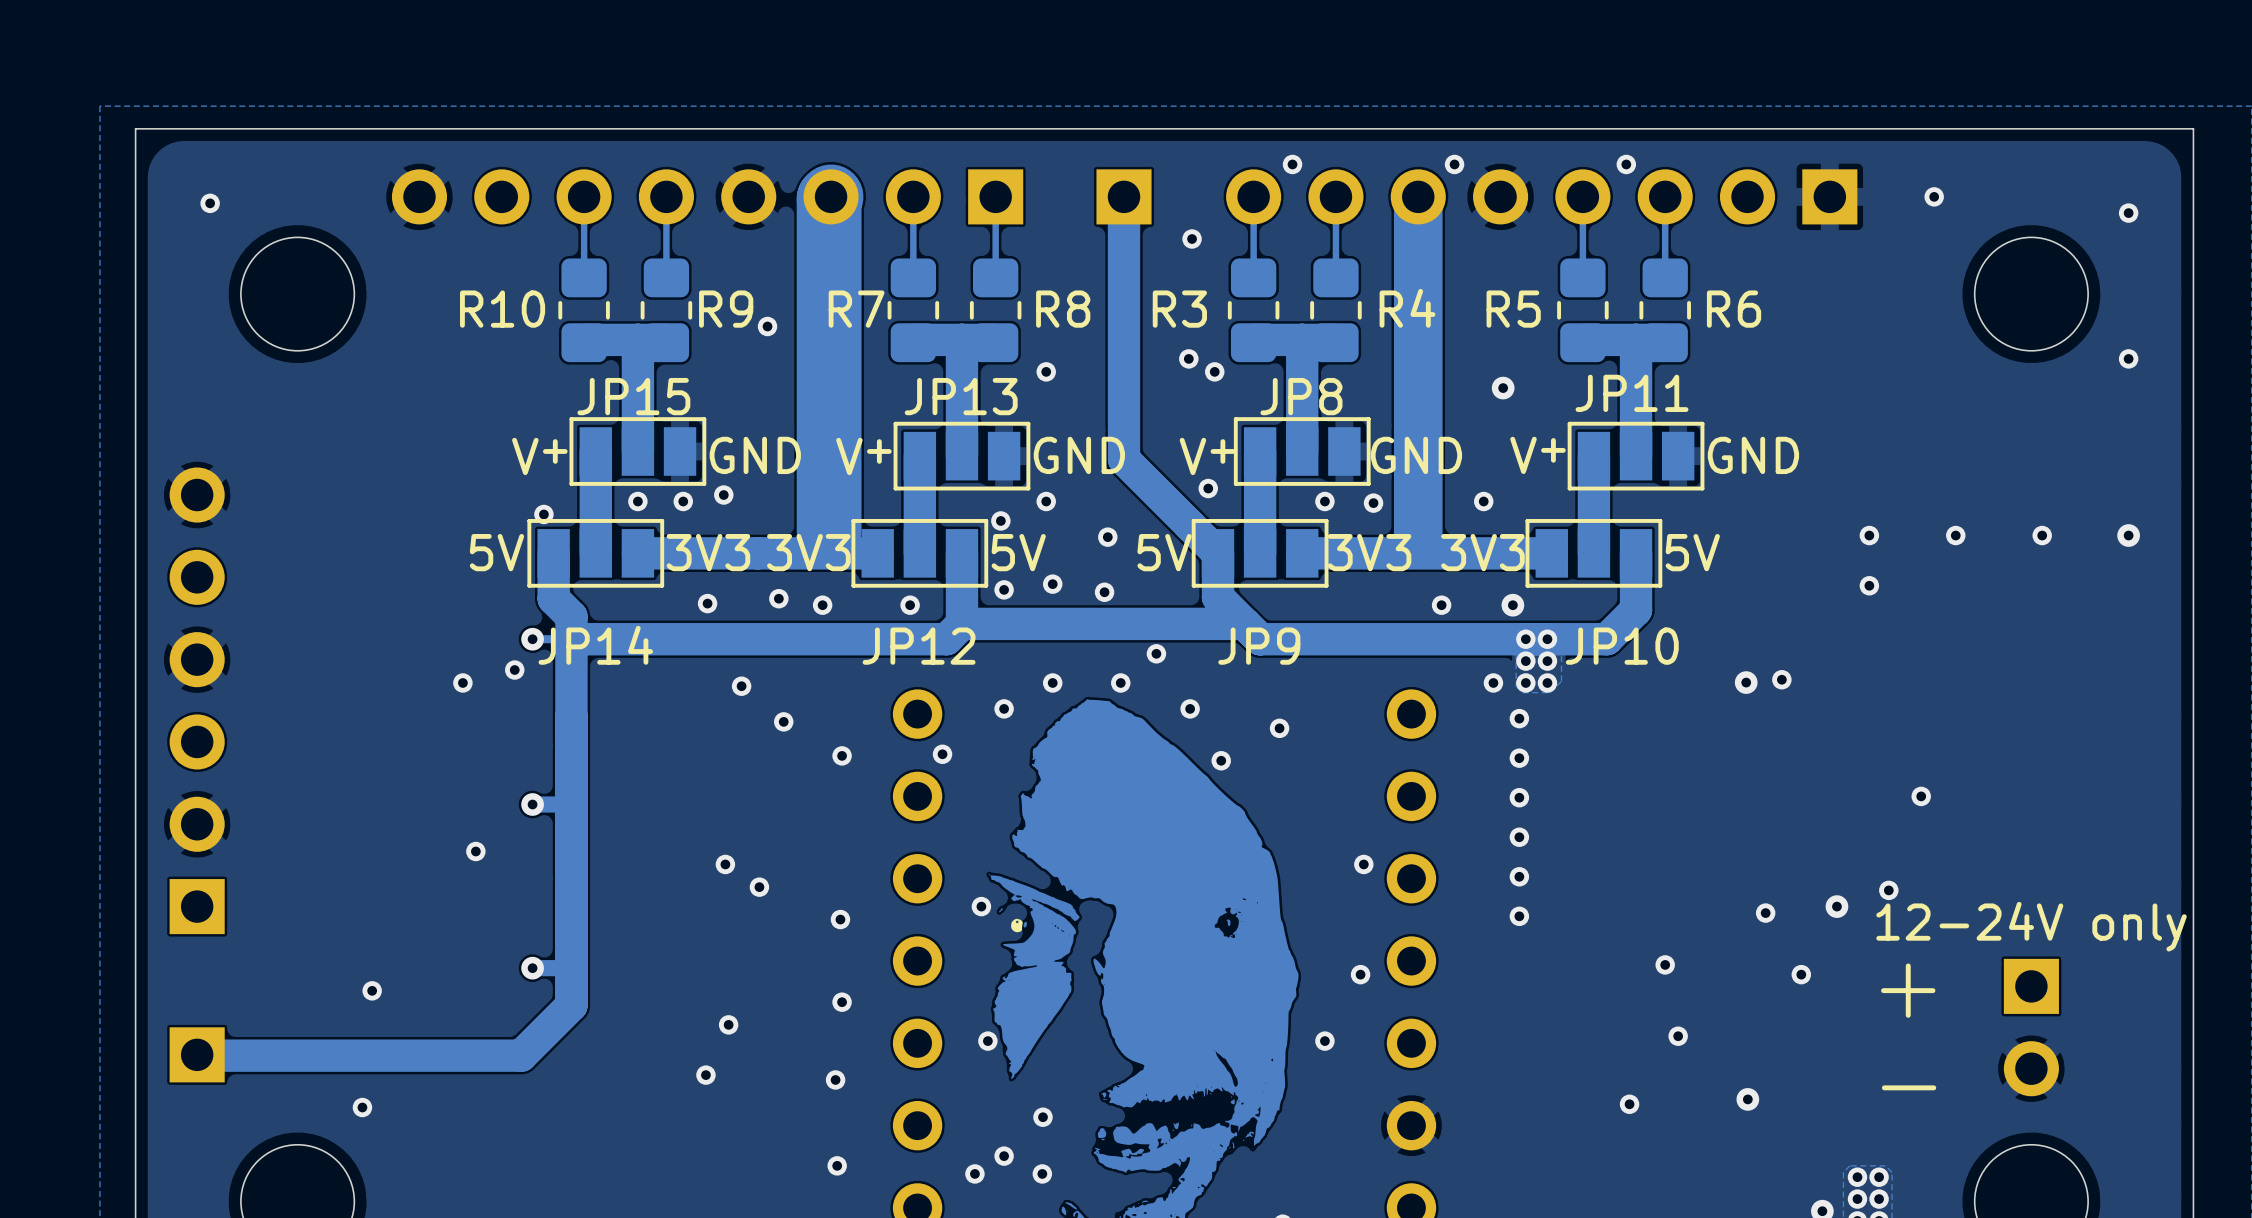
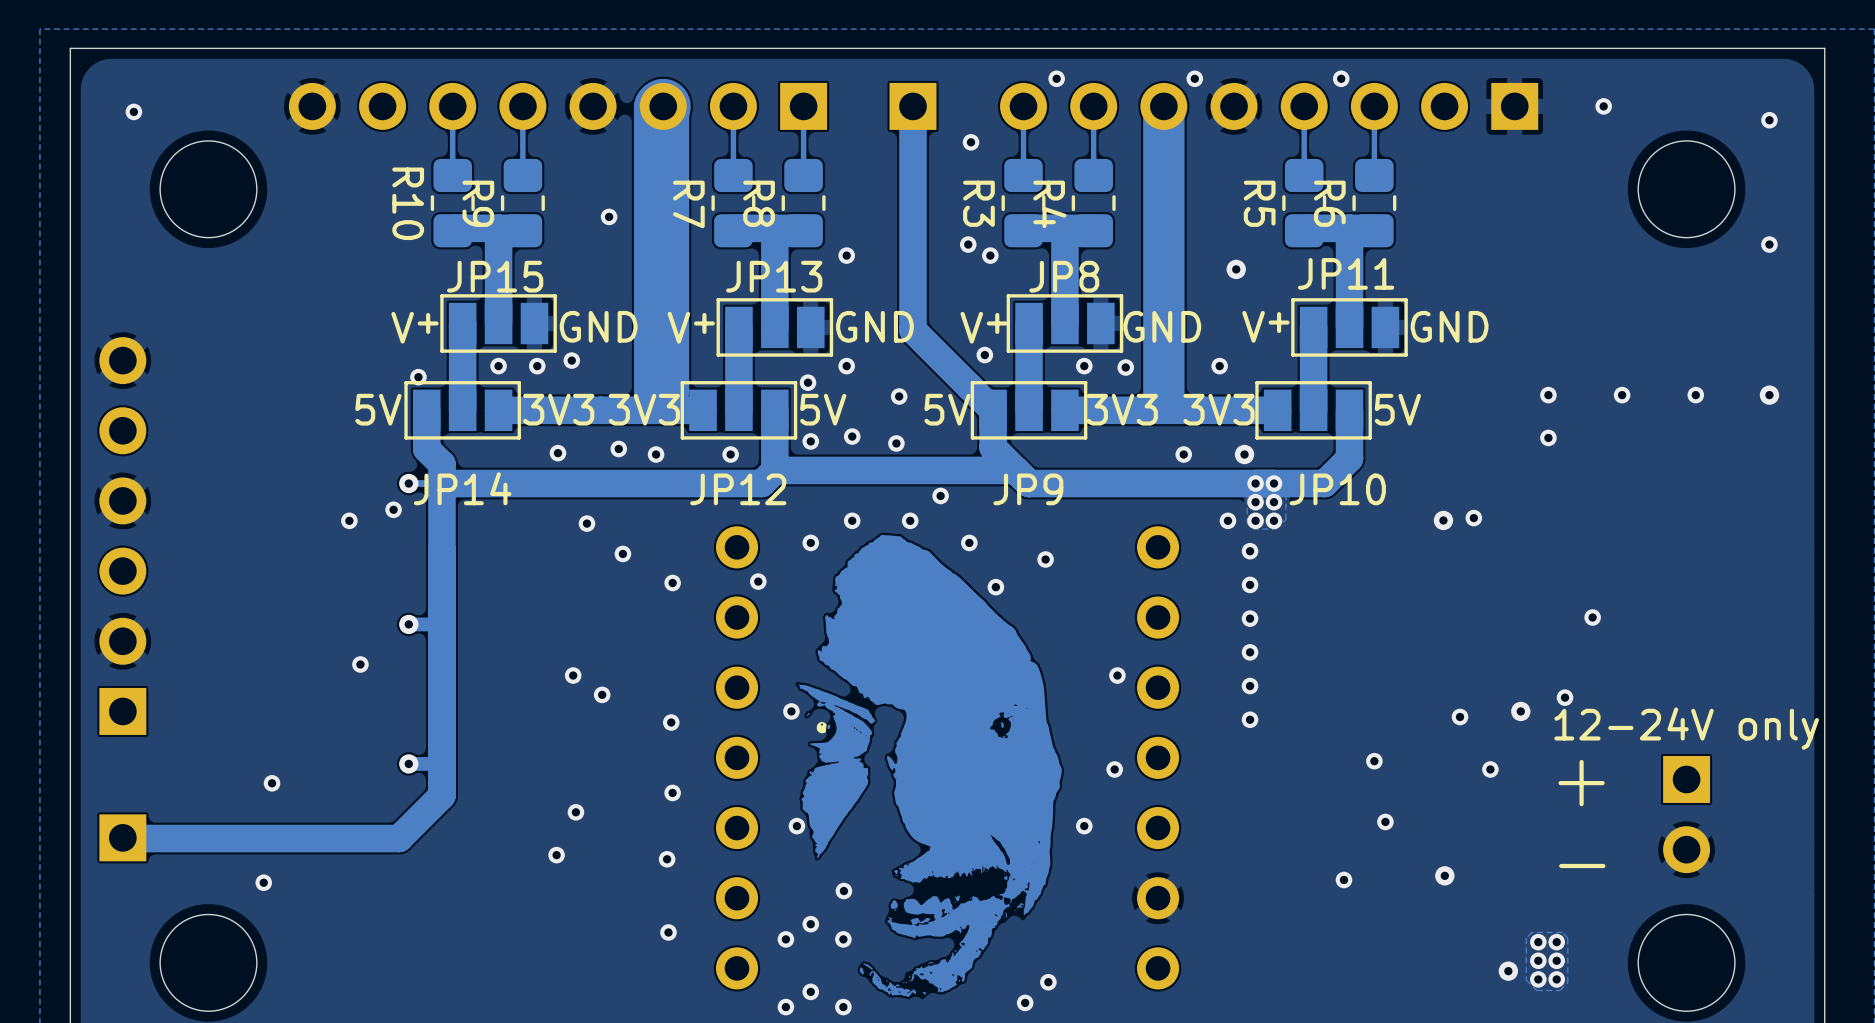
R4 name rotation: 0° (1407, 308) -> 90° clockwise (1049, 204)
R4 name position: R4 (1407, 308) -> R4 (1049, 204)
R10 name rotation: 0° (502, 309) -> 90° clockwise (408, 203)
R9 name rotation: 0° (726, 309) -> 90° clockwise (478, 203)
R9 name position: R9 (726, 309) -> R9 (478, 203)
R7 name rotation: 0° (856, 309) -> 90° clockwise (688, 204)
R8 name rotation: 0° (1063, 309) -> 90° clockwise (759, 203)
R8 name position: R8 (1063, 309) -> R8 (759, 203)
R3 name rotation: 0° (1179, 309) -> 90° clockwise (978, 203)
R5 name rotation: 0° (1513, 309) -> 90° clockwise (1259, 203)
R6 name rotation: 0° (1734, 309) -> 90° clockwise (1329, 203)
R6 name position: R6 (1734, 309) -> R6 (1329, 203)

